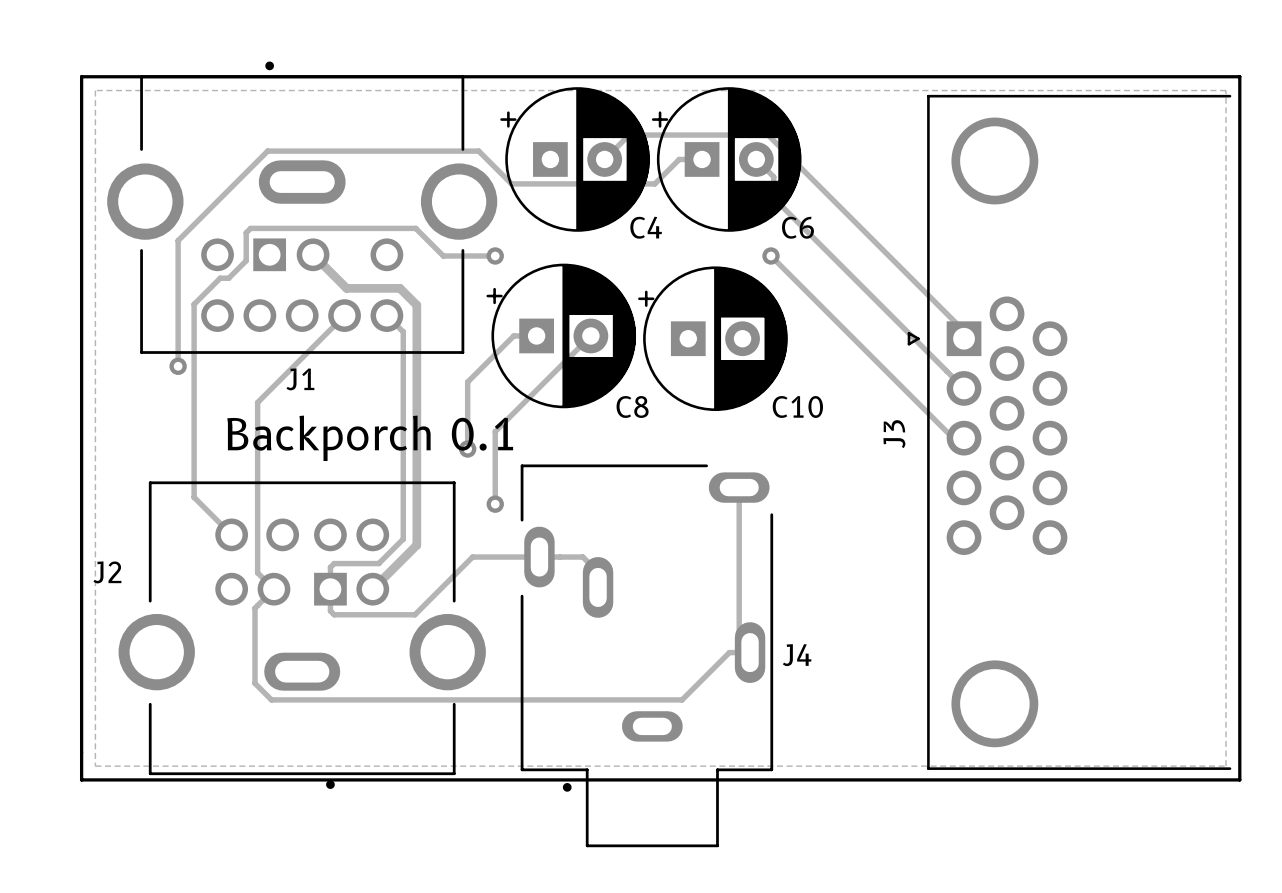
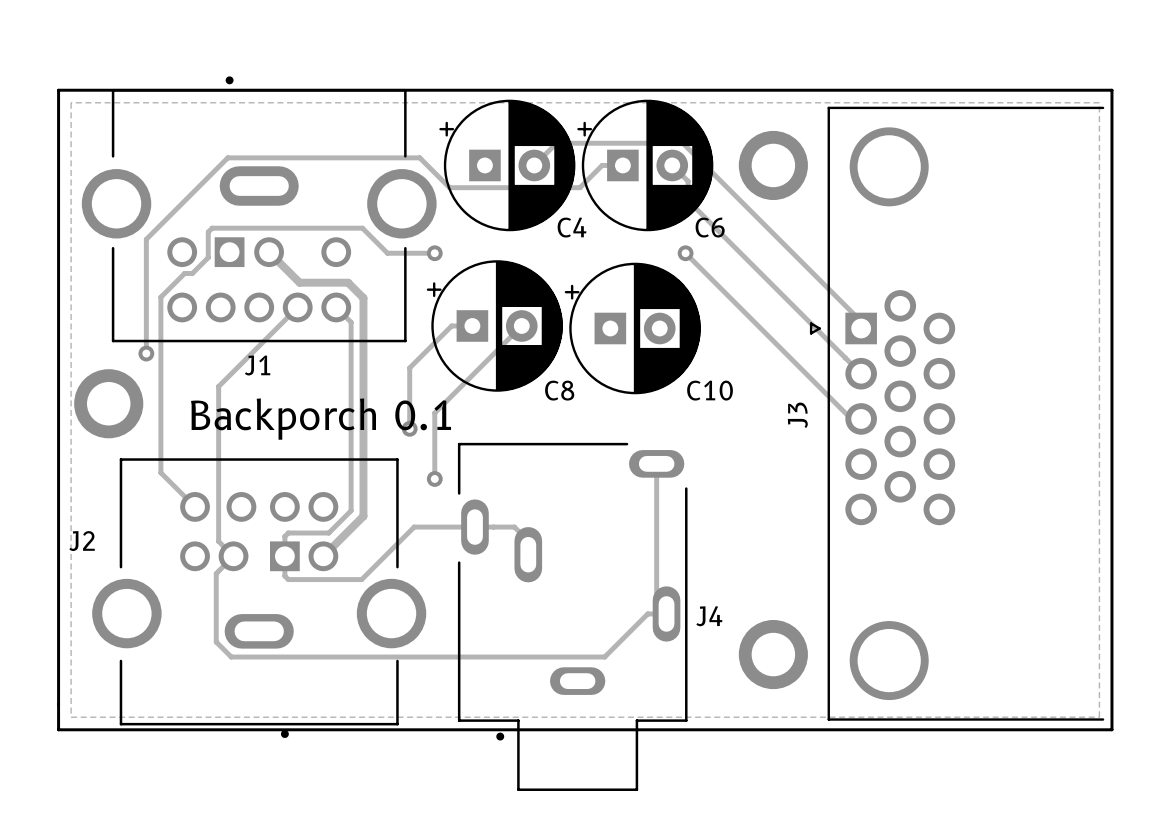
part: none -> (773, 165)
part: none -> (108, 403)
part: none -> (773, 654)

